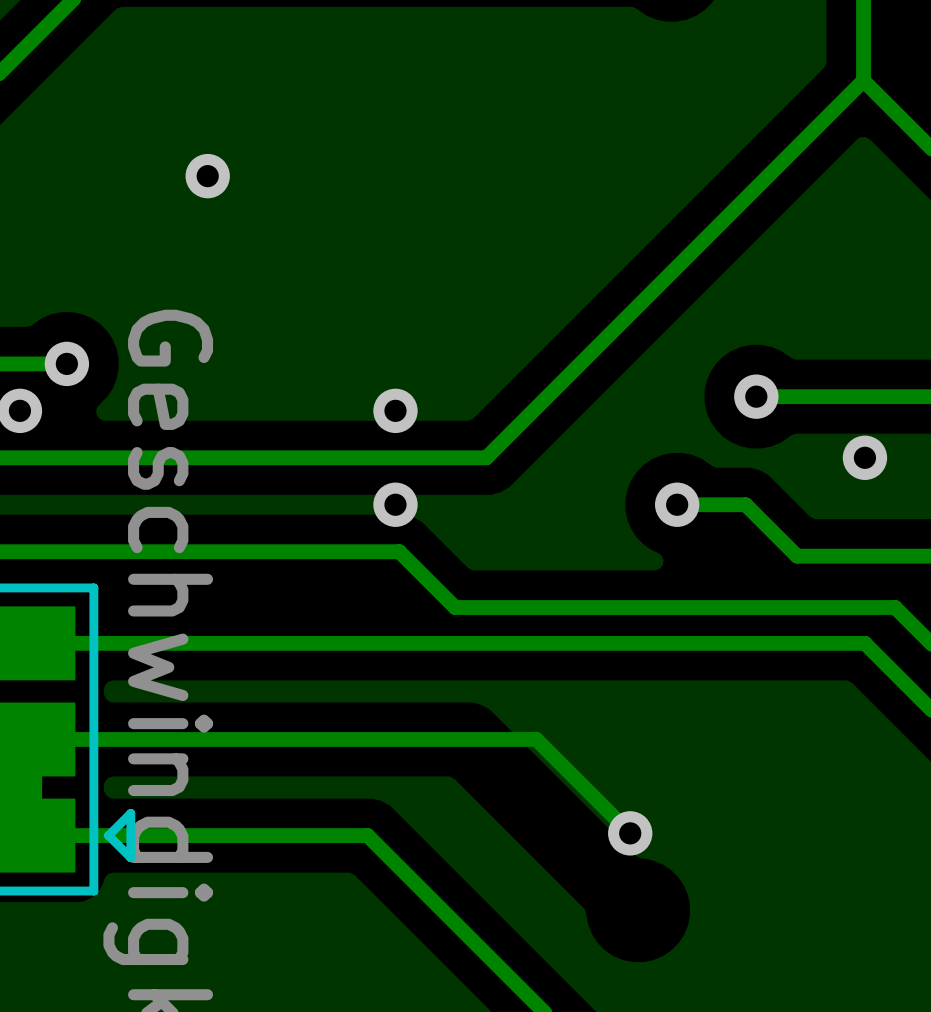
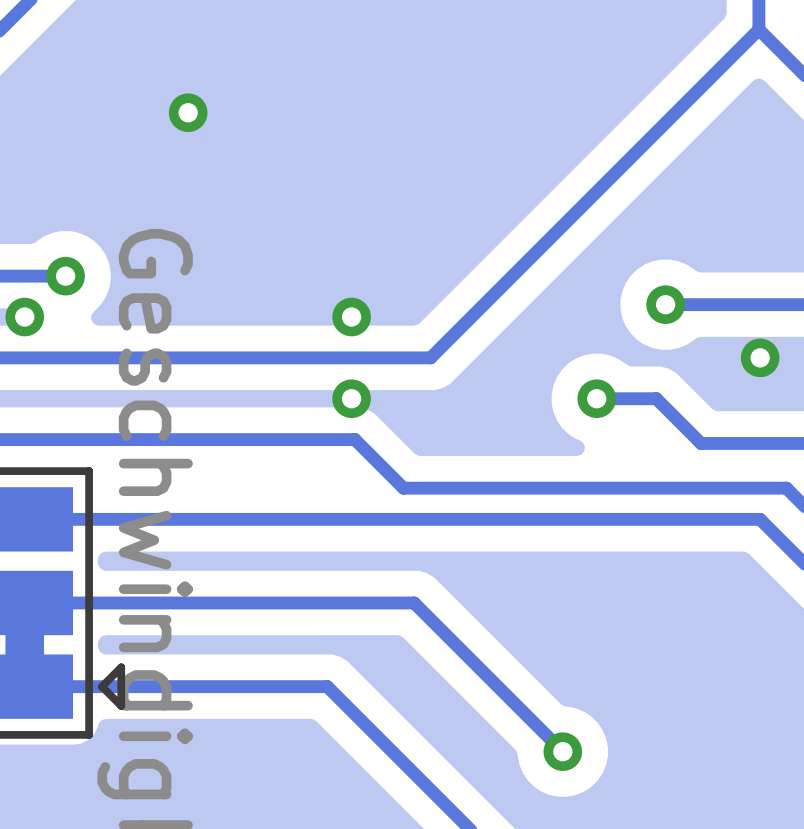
track: (467, 739) (536, 739) (630, 833) -> (414, 603) (562, 751)
via position: (630, 833) -> (562, 751)

